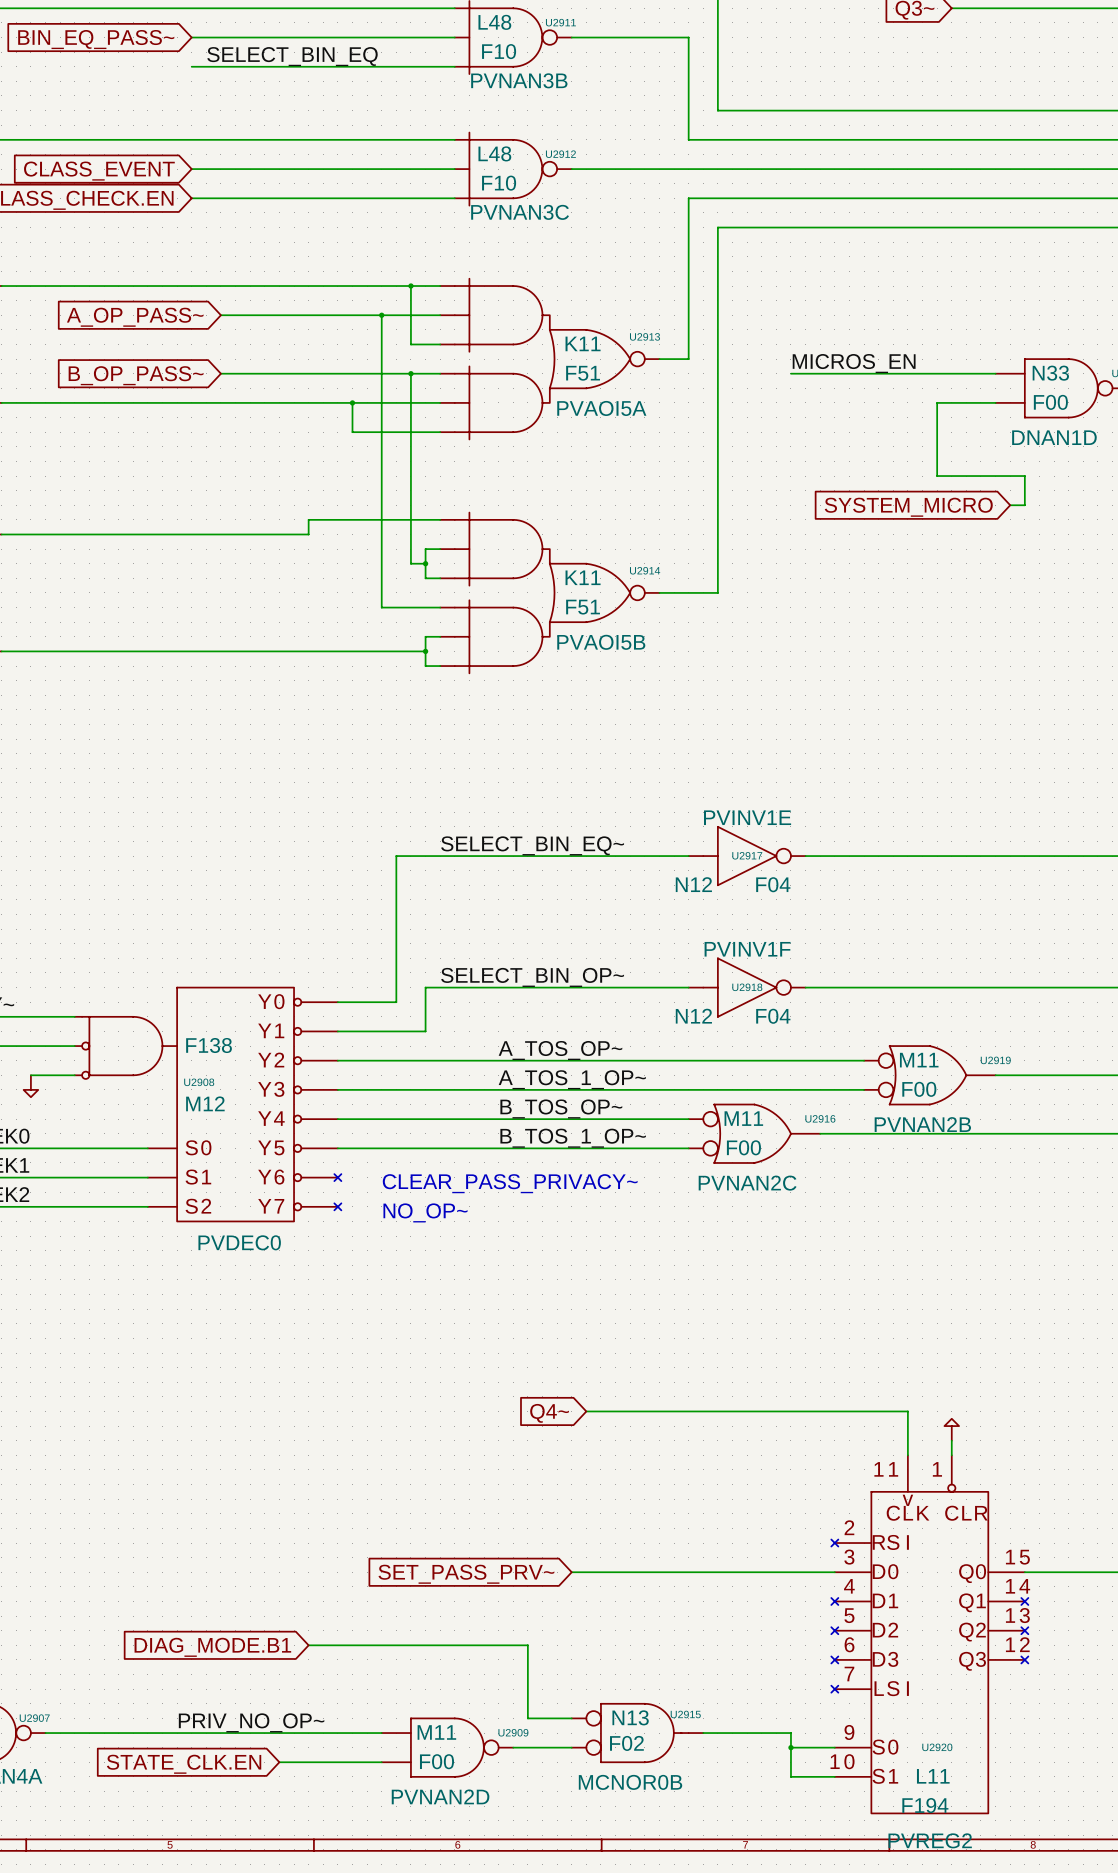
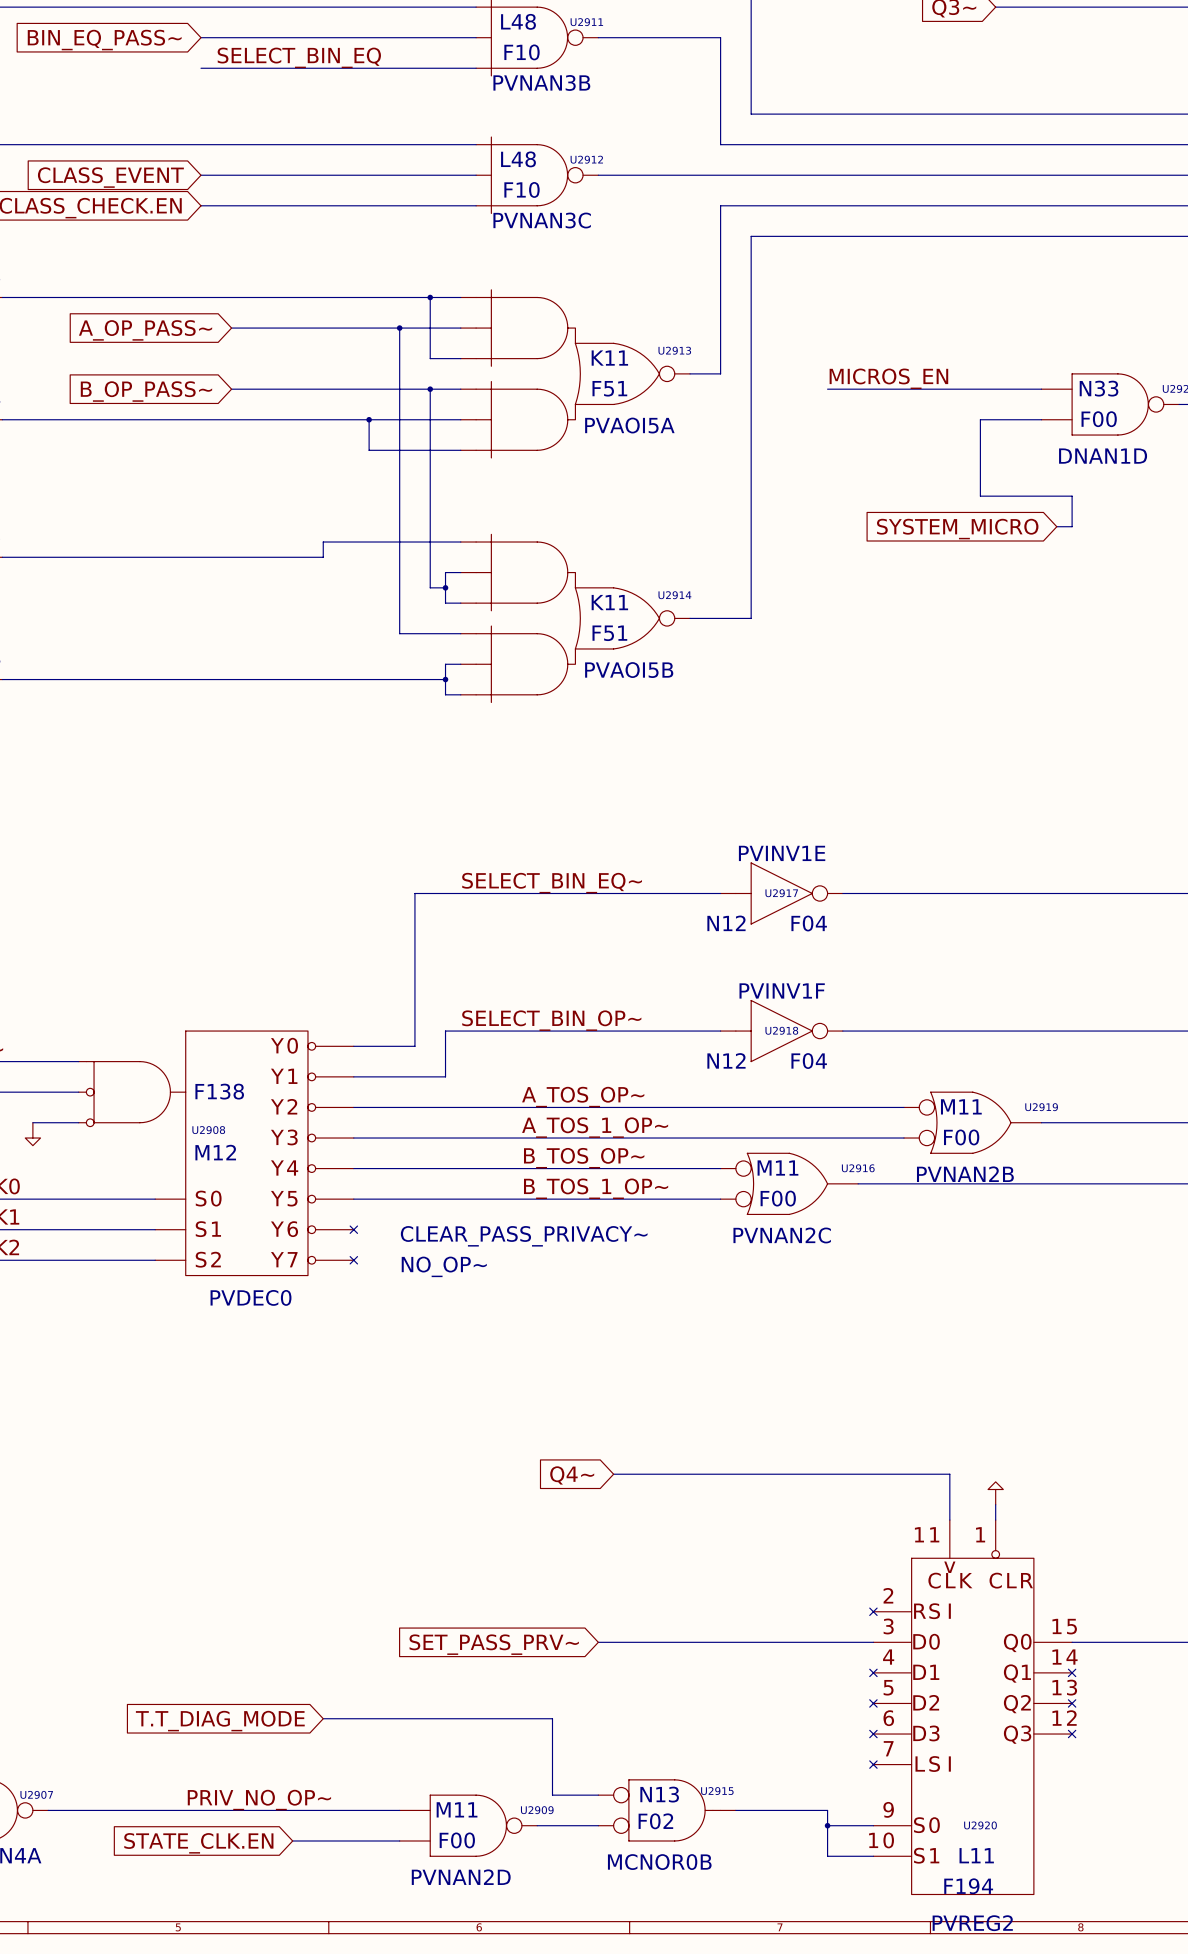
global label: DIAG_MODE.B1 (212, 1647) -> T.T_DIAG_MODE (220, 1721)

